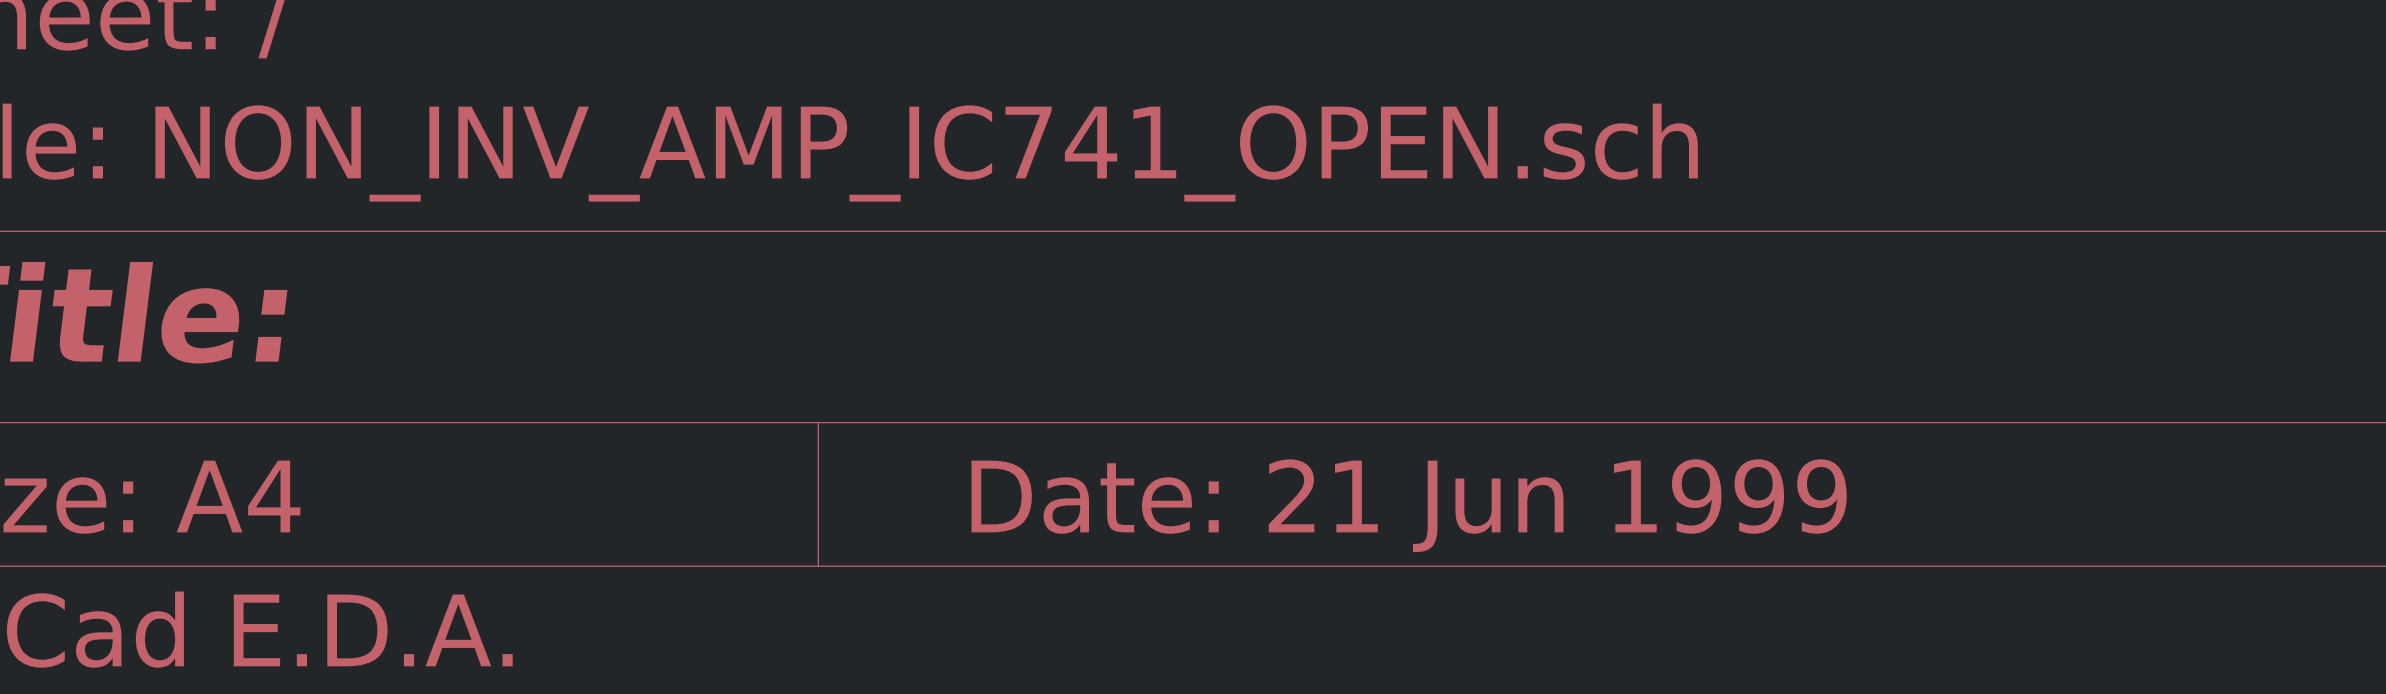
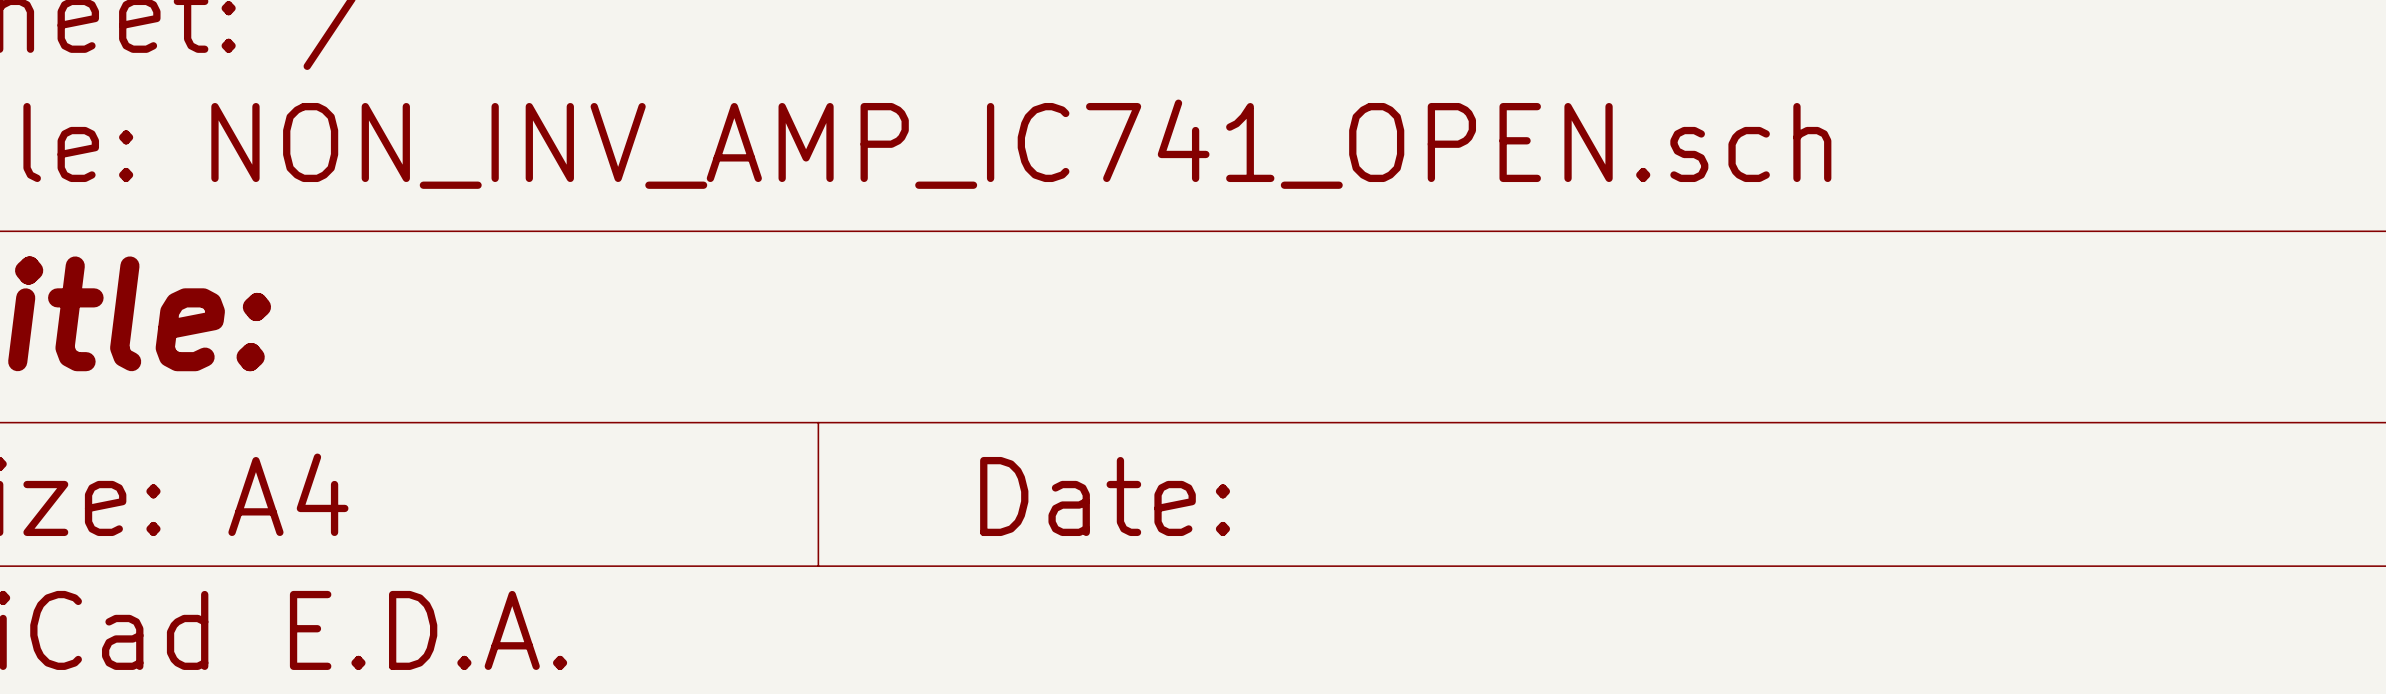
title block: Date: 21 Jun 1999 (1409, 505) -> Date: (1105, 496)

